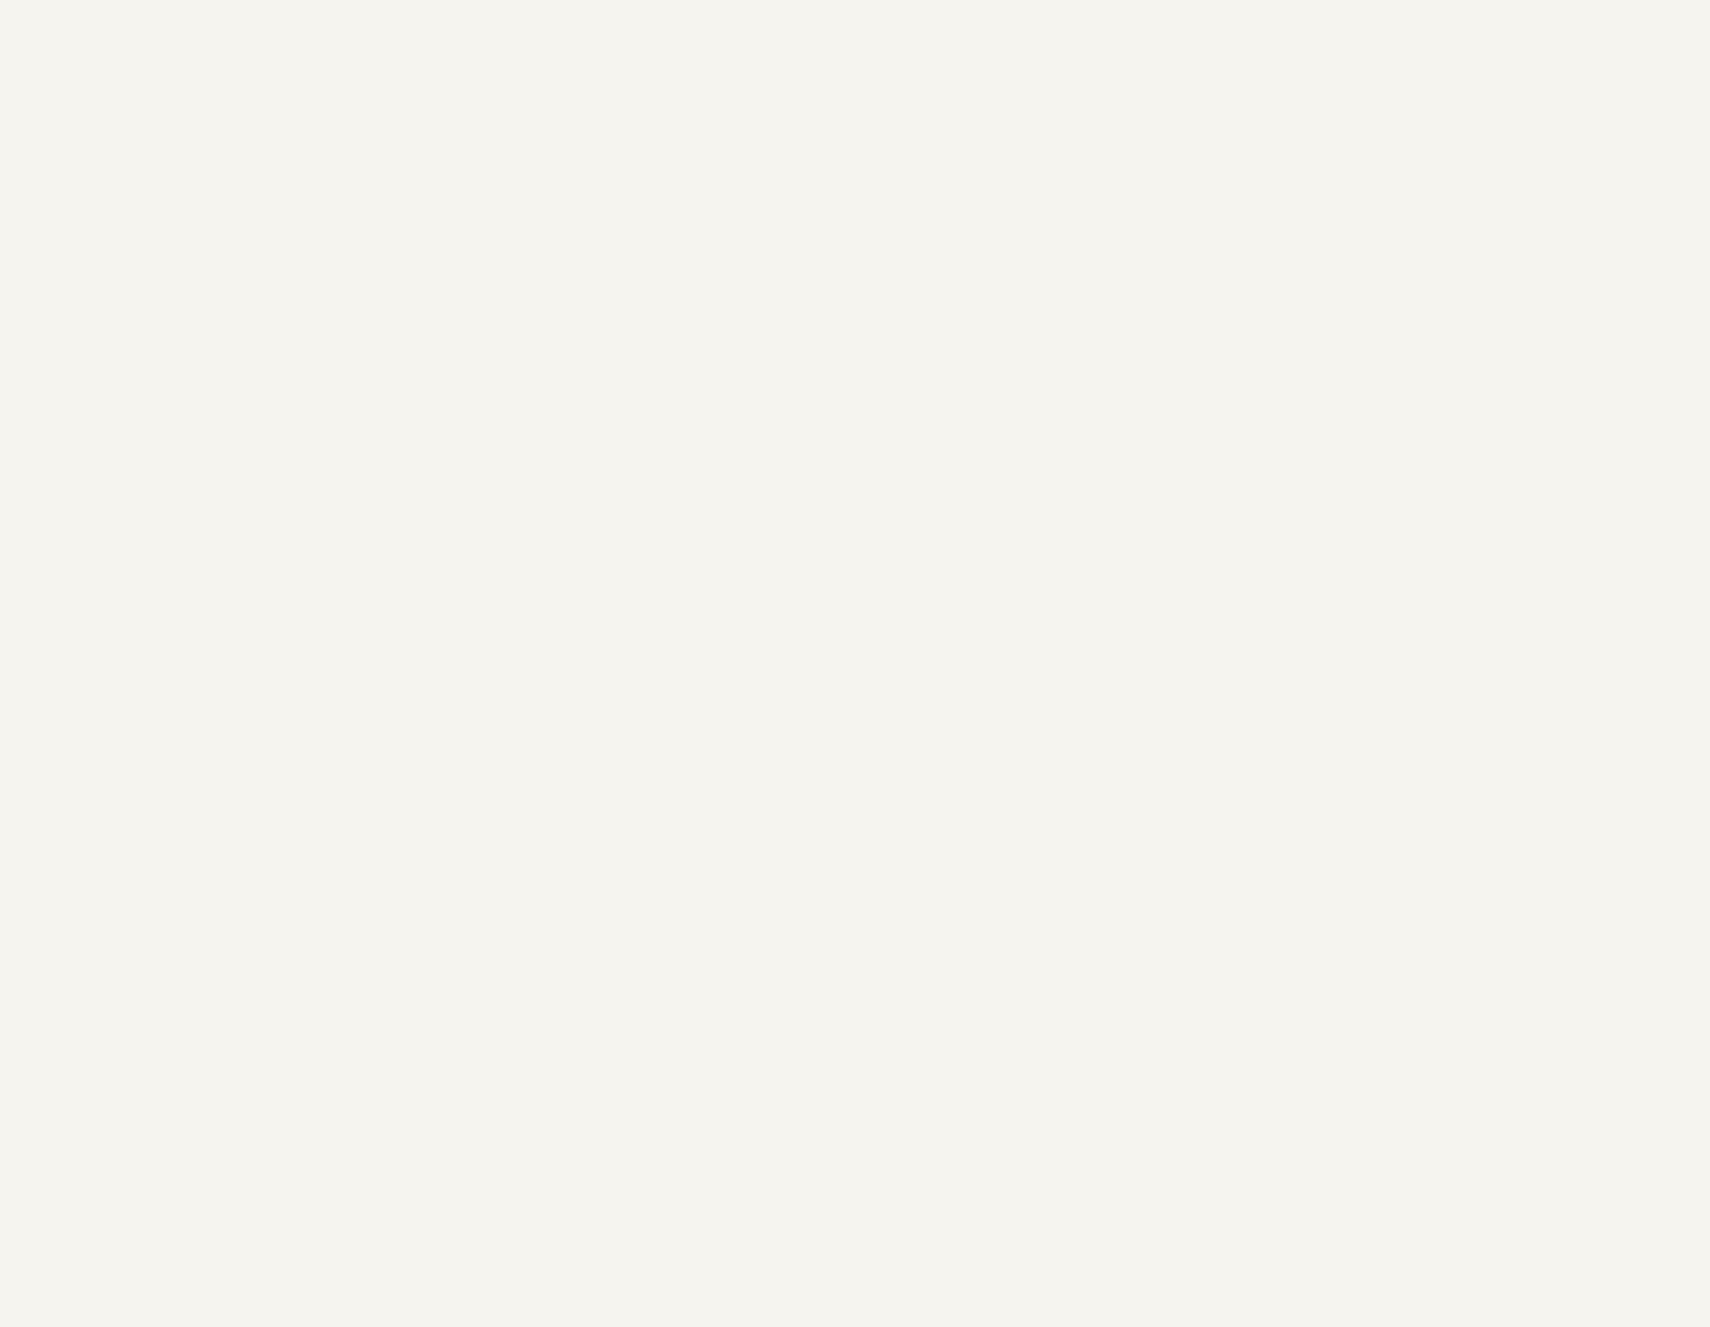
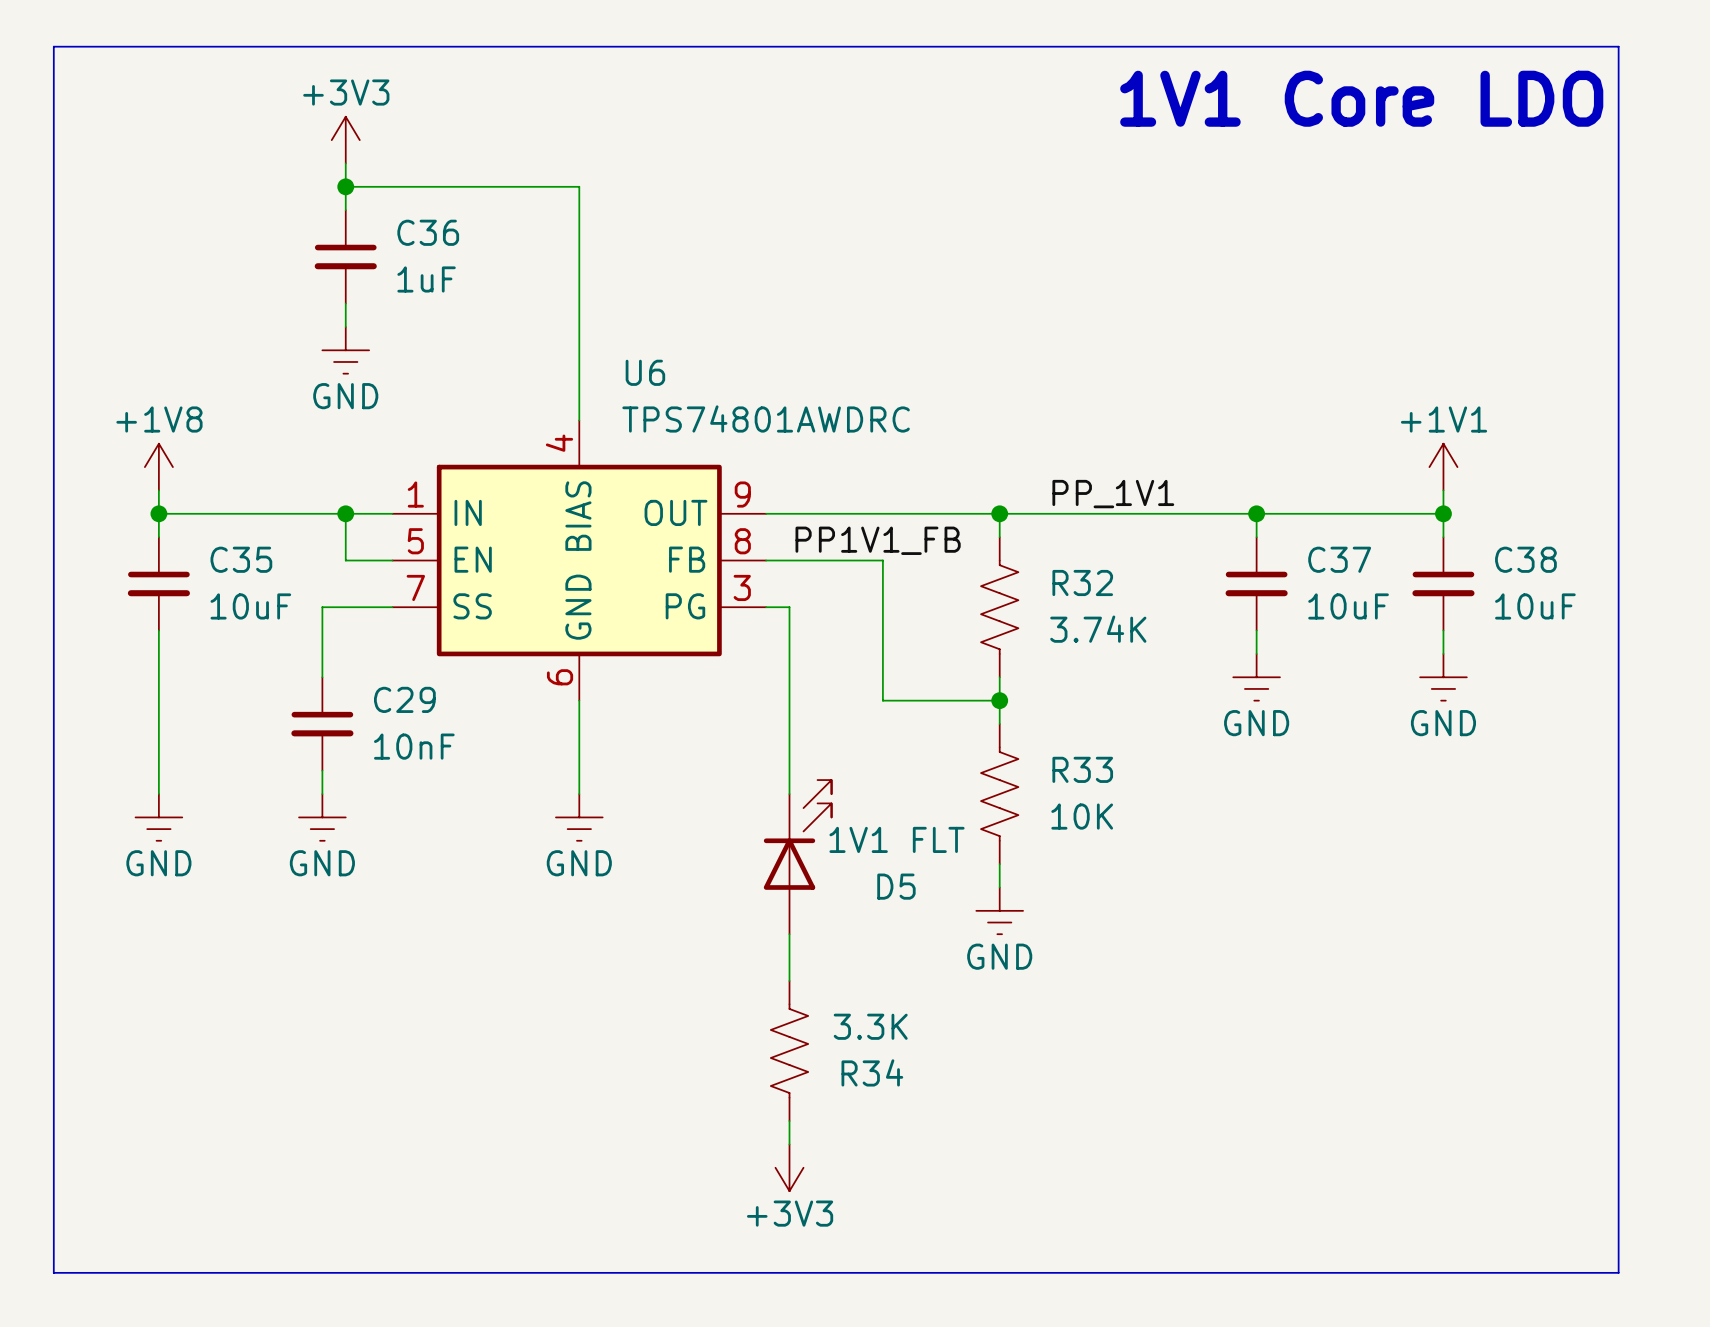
line: none -> (53, 46) (1618, 46) (1618, 1272) (53, 1272) (53, 46)
text: none -> 1V1 Core LDO (1361, 98)
power symbol: none -> +3V3 (345, 140)
wire: none -> (345, 163) (345, 210)
wire: none -> (345, 186) (579, 186) (579, 420)
junction: none -> (345, 186)
C36: none -> 1uF (345, 256)
wire: none -> (345, 303) (345, 326)
power symbol: none -> GND (345, 350)
power symbol: none -> +1V8 (158, 467)
power symbol: none -> +1V1 (1443, 467)
wire: none -> (158, 490) (158, 537)
wire: none -> (1443, 490) (1443, 537)
label: none -> PP_1V1 (1113, 494)
wire: none -> (158, 513) (392, 513)
junction: none -> (158, 513)
wire: none -> (345, 513) (345, 560) (392, 560)
junction: none -> (345, 513)
wire: none -> (766, 513) (1443, 513)
wire: none -> (999, 513) (999, 537)
junction: none -> (999, 513)
wire: none -> (1256, 513) (1256, 537)
junction: none -> (1256, 513)
junction: none -> (1443, 513)
label: none -> PP1V1_FB (878, 540)
U6: none -> TPS74801AWDRC (579, 560)
wire: none -> (766, 560) (882, 560) (882, 700) (999, 700)
C35: none -> 10uF (158, 583)
C37: none -> 10uF (1256, 583)
C38: none -> 10uF (1443, 583)
wire: none -> (392, 607) (322, 607) (322, 677)
wire: none -> (766, 607) (789, 607) (789, 794)
R32: none -> 3.74K (999, 607)
wire: none -> (158, 630) (158, 794)
wire: none -> (1256, 630) (1256, 653)
wire: none -> (1443, 630) (1443, 653)
wire: none -> (999, 677) (999, 724)
power symbol: none -> GND (1256, 677)
power symbol: none -> GND (1443, 677)
wire: none -> (579, 700) (579, 794)
junction: none -> (999, 700)
C29: none -> 10nF (322, 724)
wire: none -> (322, 770) (322, 794)
R33: none -> 10K (999, 794)
power symbol: none -> GND (158, 817)
power symbol: none -> GND (322, 817)
power symbol: none -> GND (579, 817)
D5: none -> 1V1 FLT (797, 857)
wire: none -> (999, 864) (999, 887)
power symbol: none -> GND (999, 910)
wire: none -> (789, 934) (789, 980)
R34: none -> 3.3K (789, 1050)
wire: none -> (789, 1121) (789, 1144)
power symbol: none -> +3V3 (789, 1167)

